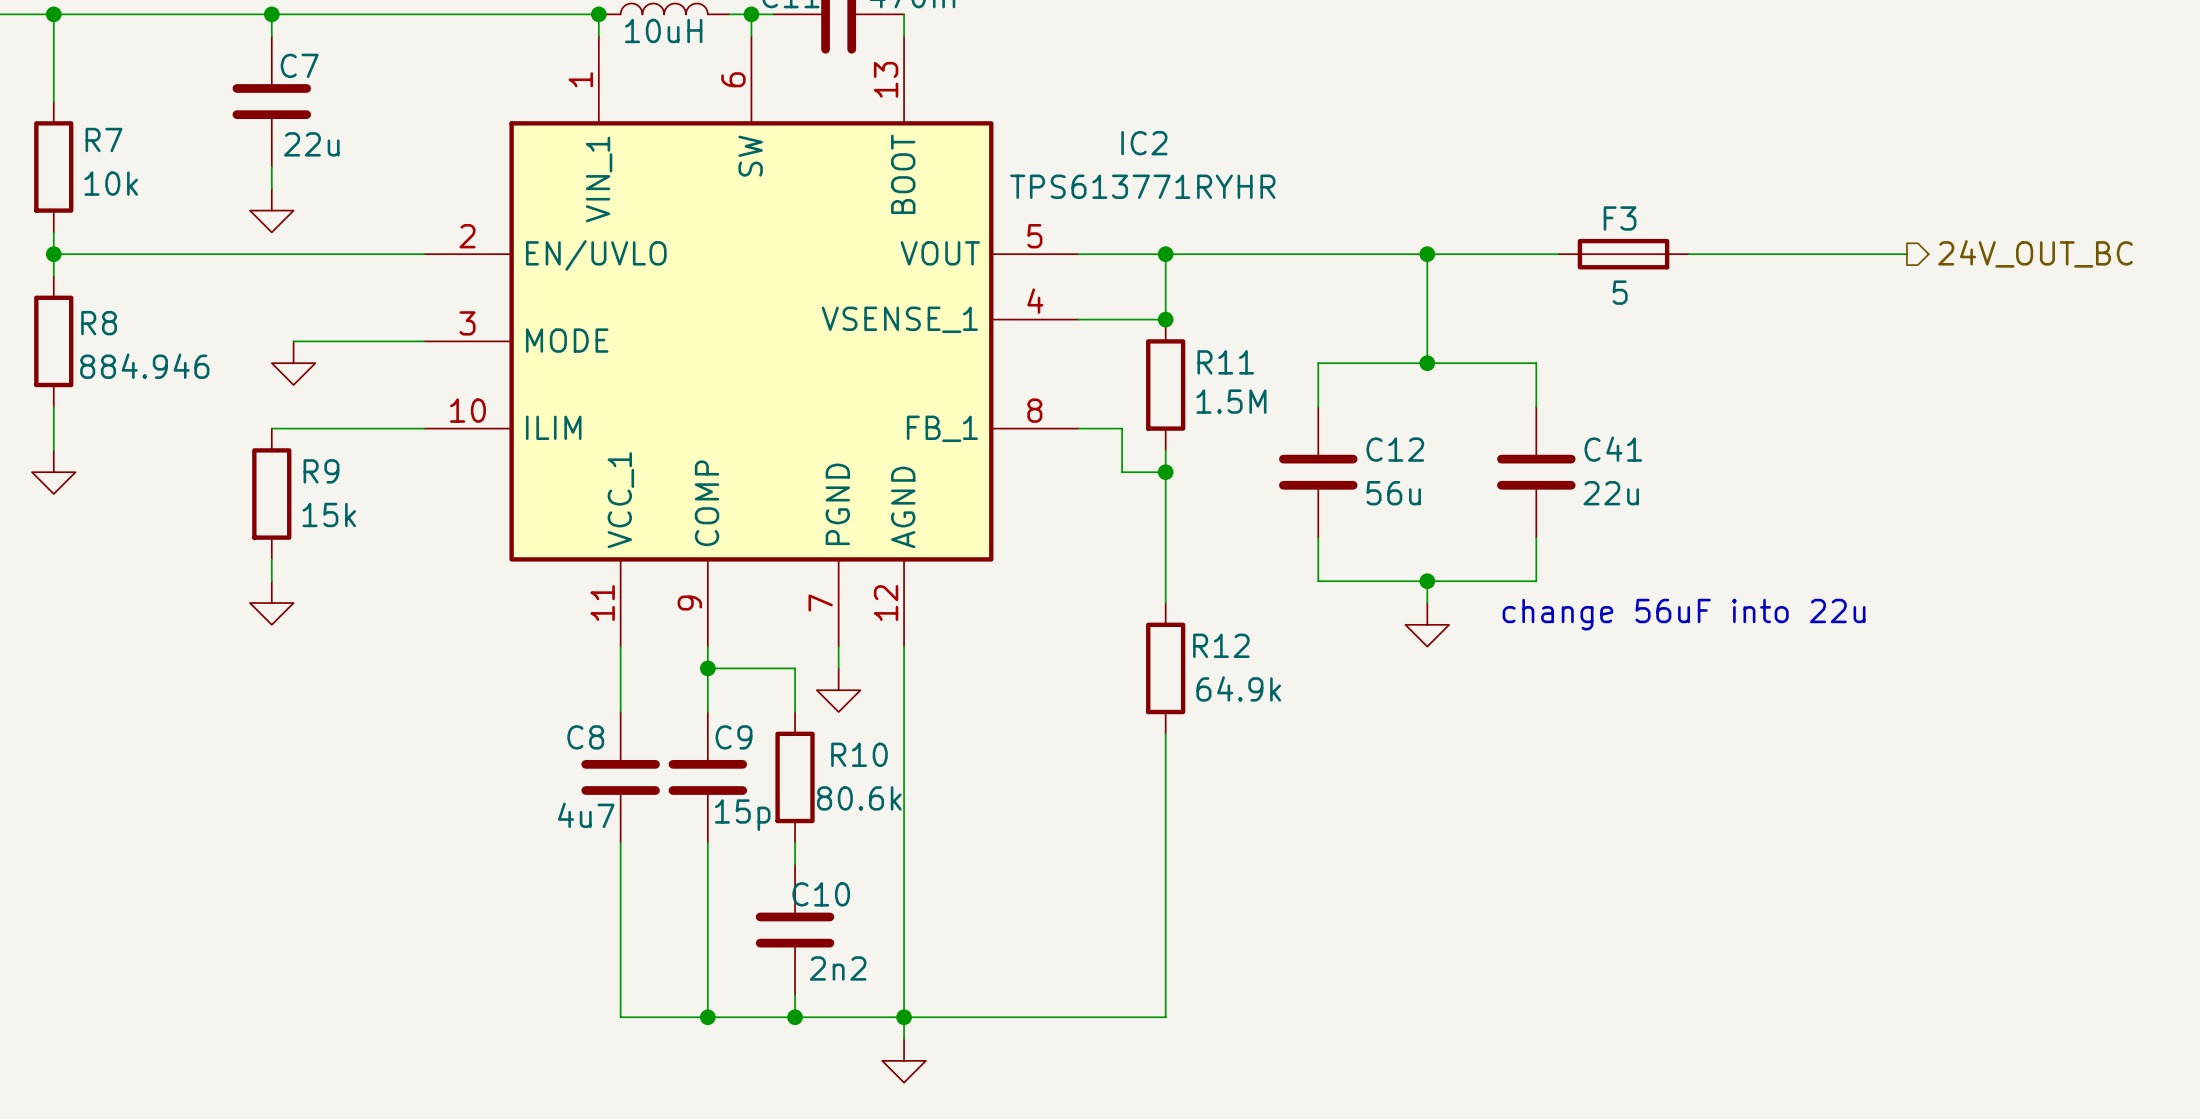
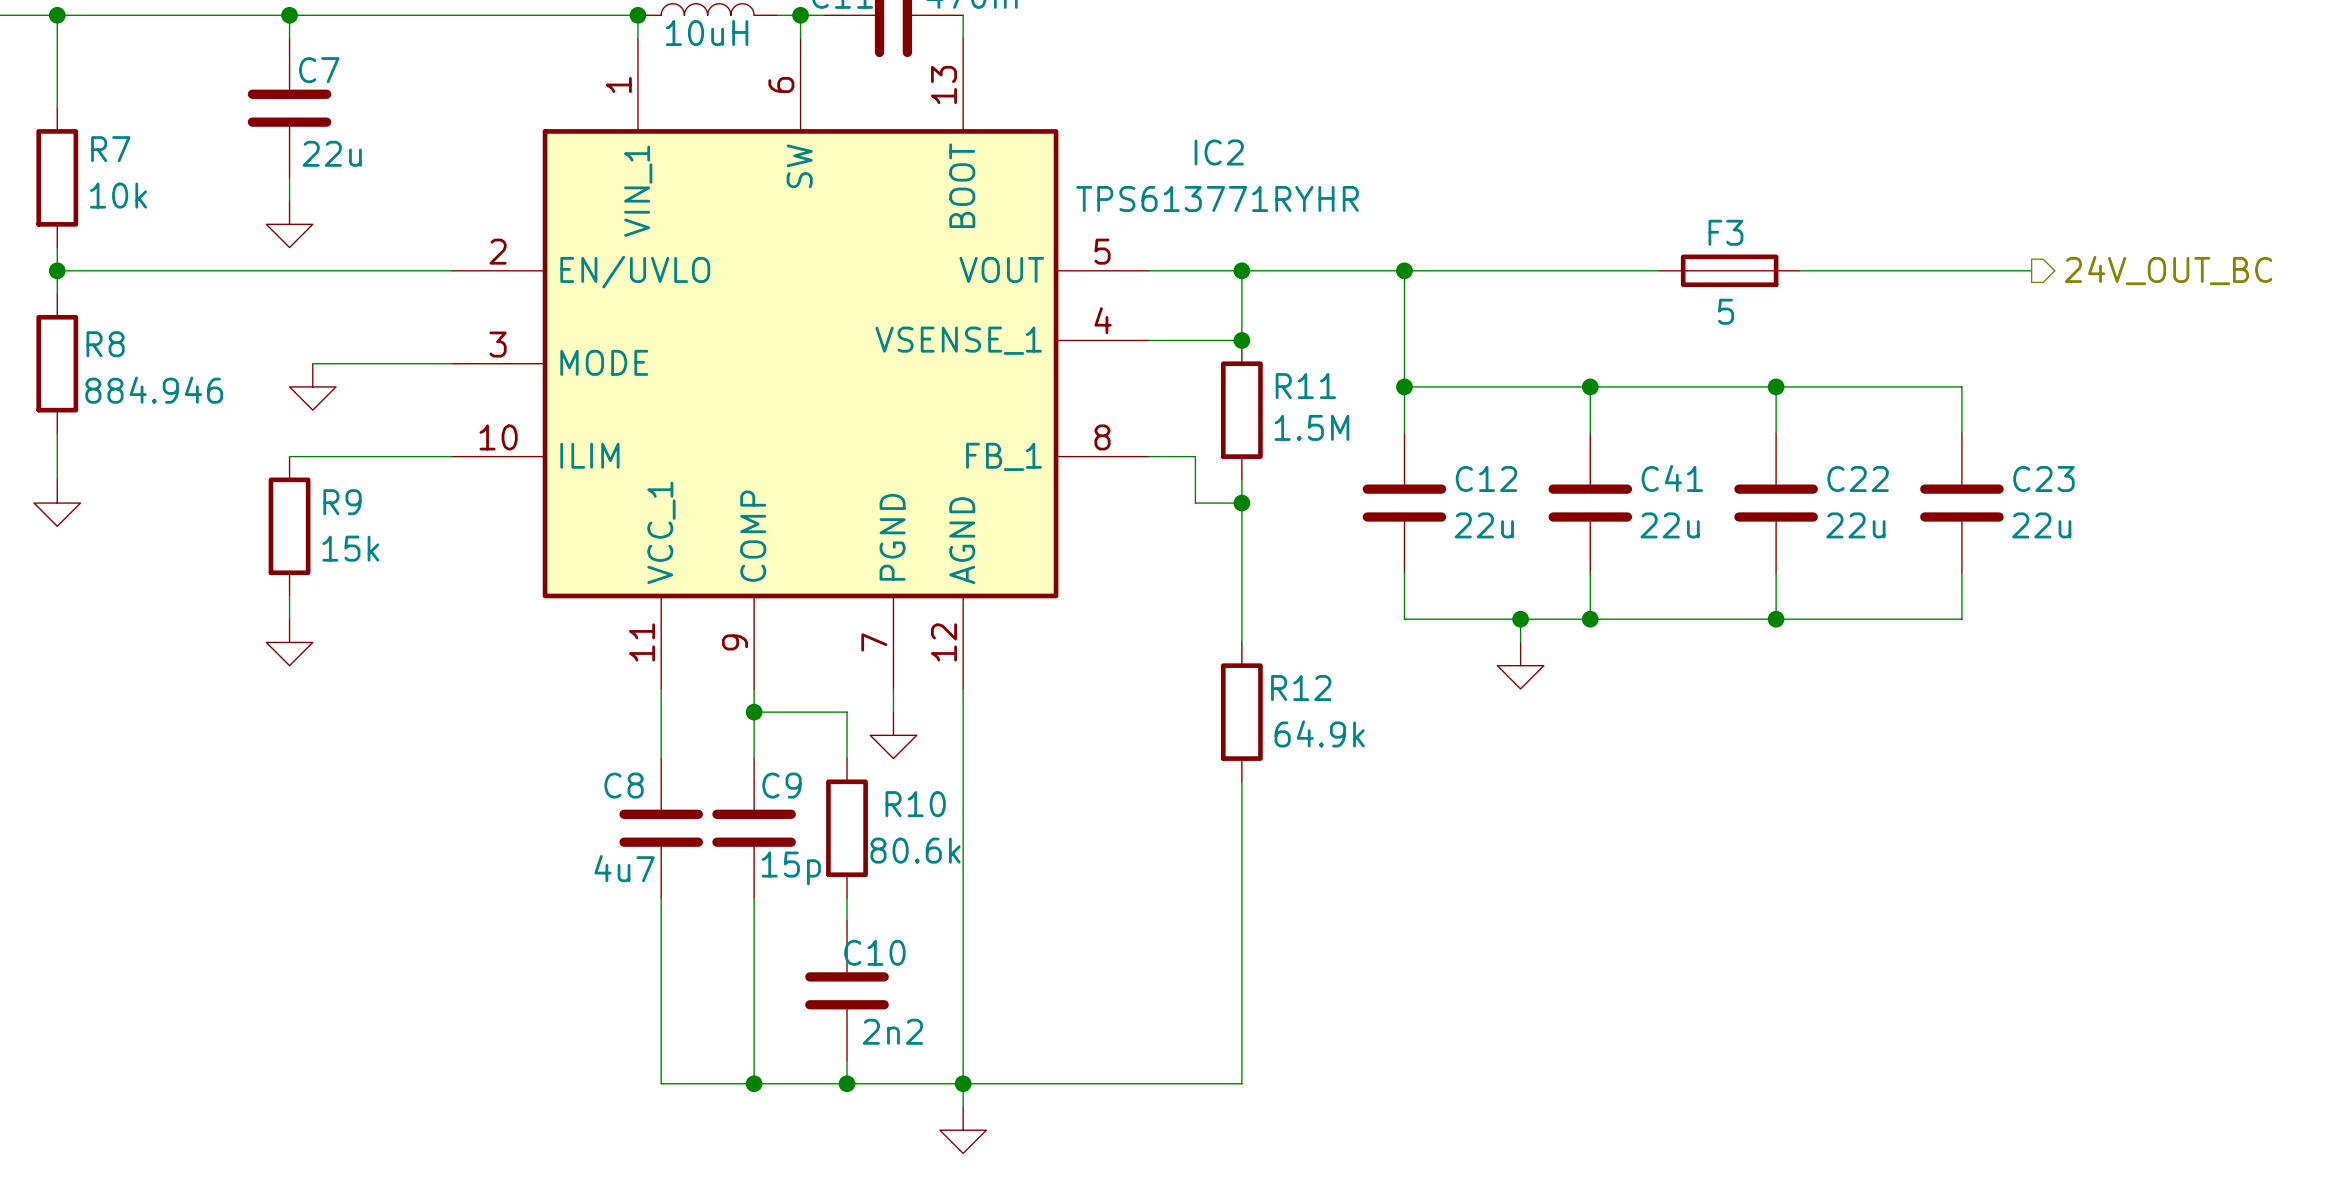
junction: none -> (1404, 270)
wire: (1427, 254) (1427, 363) -> (1404, 270) (1404, 386)
junction: (1427, 254) -> none
junction: none -> (1404, 386)
junction: (1427, 363) -> none
wire: none -> (1590, 386) (1590, 433)
junction: none -> (1590, 386)
wire: (1536, 363) (1536, 406) -> (1636, 386) (1961, 386) (1961, 433)
wire: none -> (1776, 386) (1776, 433)
junction: none -> (1776, 386)
C41 position: (1536, 472) -> (1590, 503)
C22: none -> 22u (1776, 503)
C23: none -> 22u (1961, 503)
C12 value: 56u (1393, 493) -> 22u (1484, 525)
wire: none -> (1590, 572) (1590, 619)
wire: (1536, 537) (1536, 581) -> (1961, 572) (1961, 619) (1636, 619)
wire: none -> (1776, 572) (1776, 619)
junction: none -> (1590, 619)
junction: none -> (1776, 619)
text: change 56uF into 22u (1684, 614) -> none

